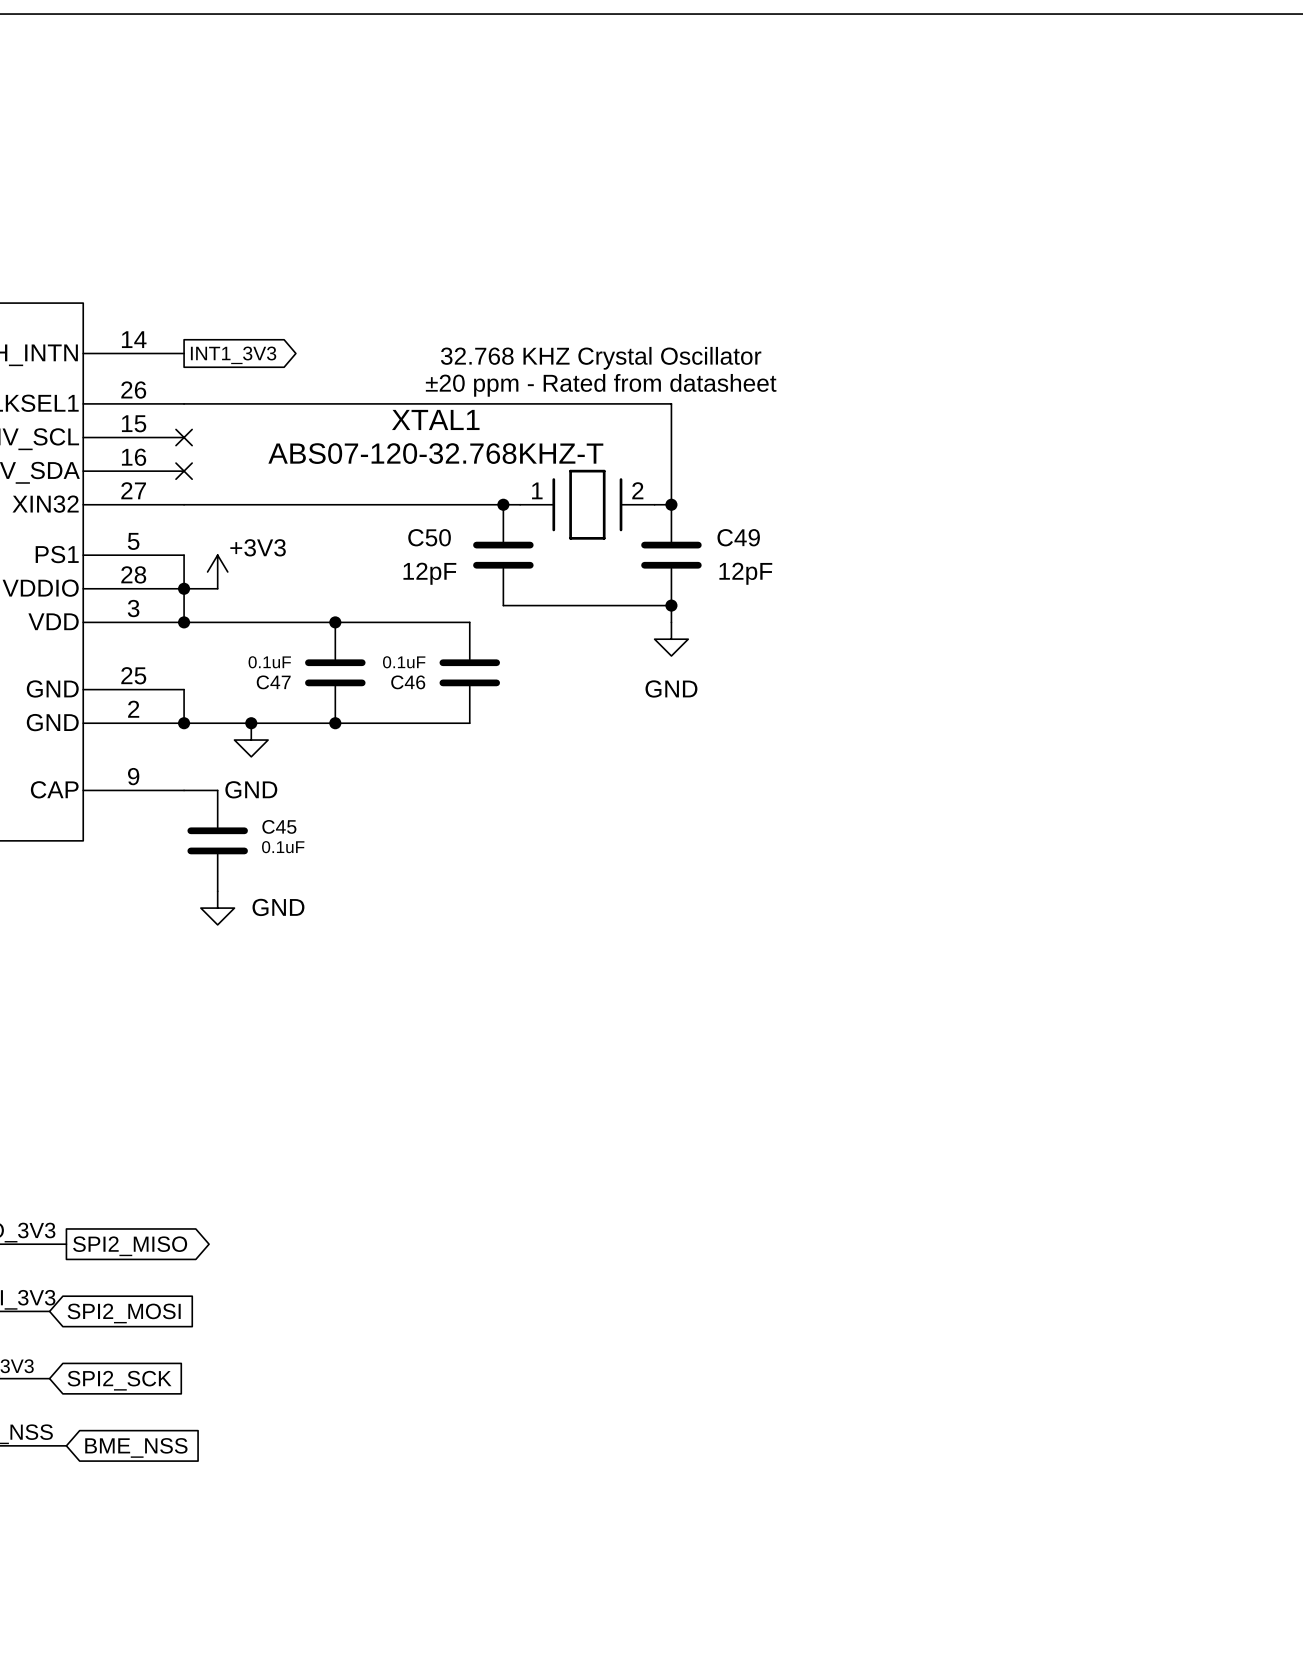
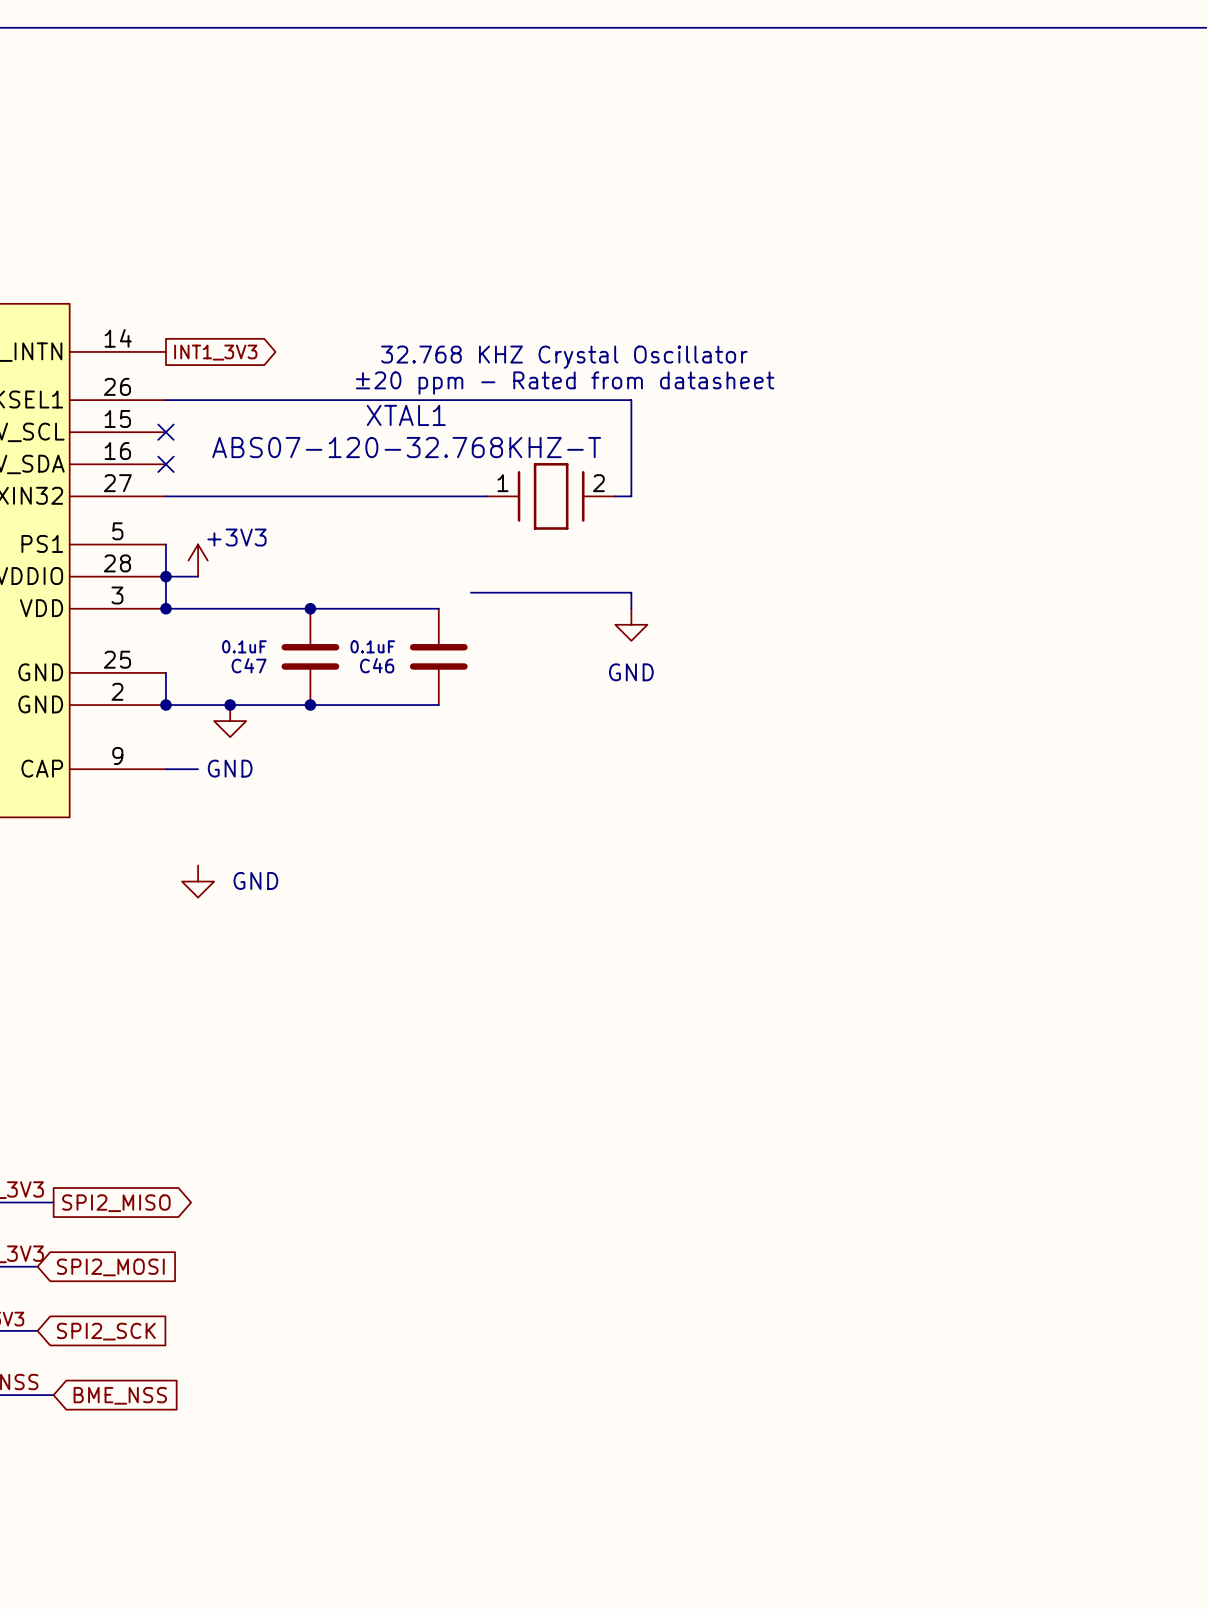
junction: (503, 504) -> none
junction: (671, 504) -> none
C50: 12pF (503, 555) -> none
C49: 12pF (671, 555) -> none
junction: (671, 605) -> none
C45: 0.1uF (217, 840) -> none

